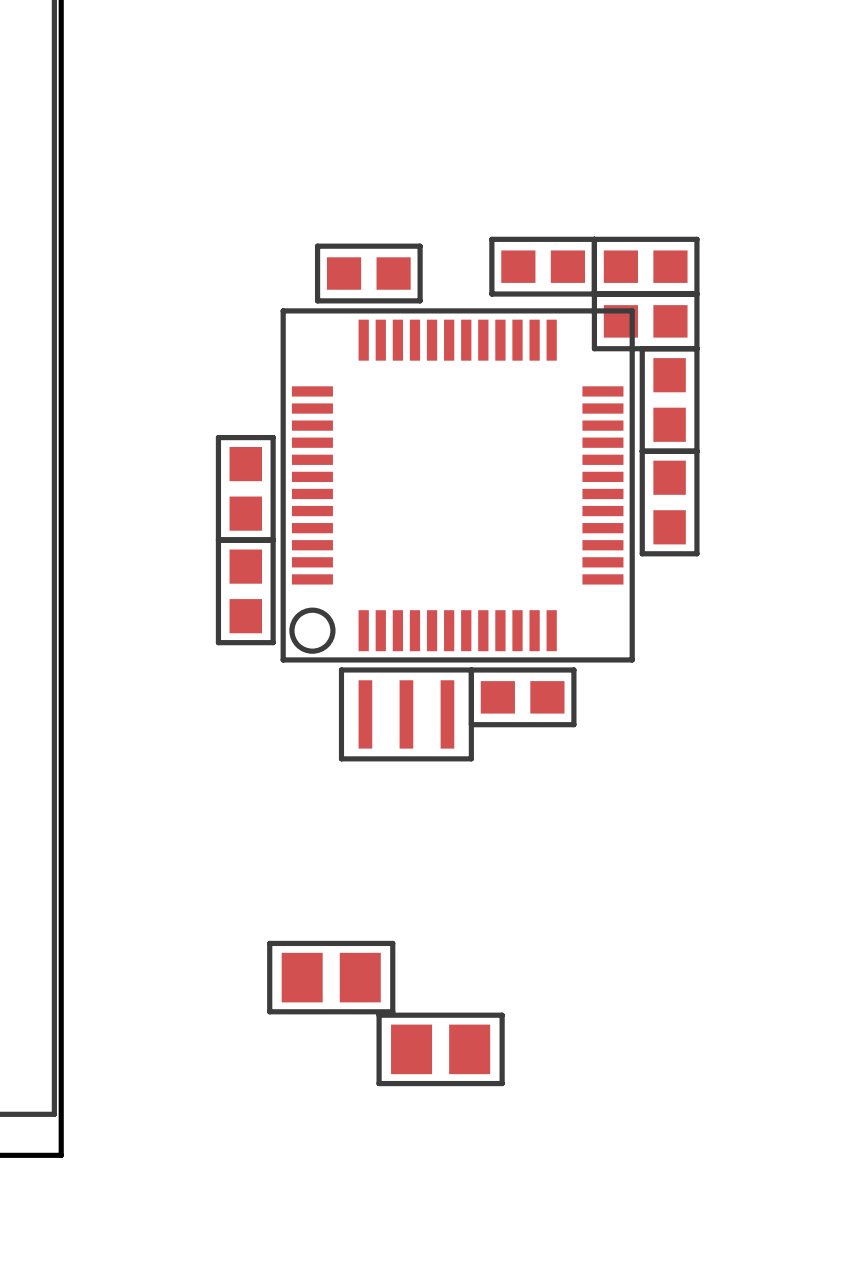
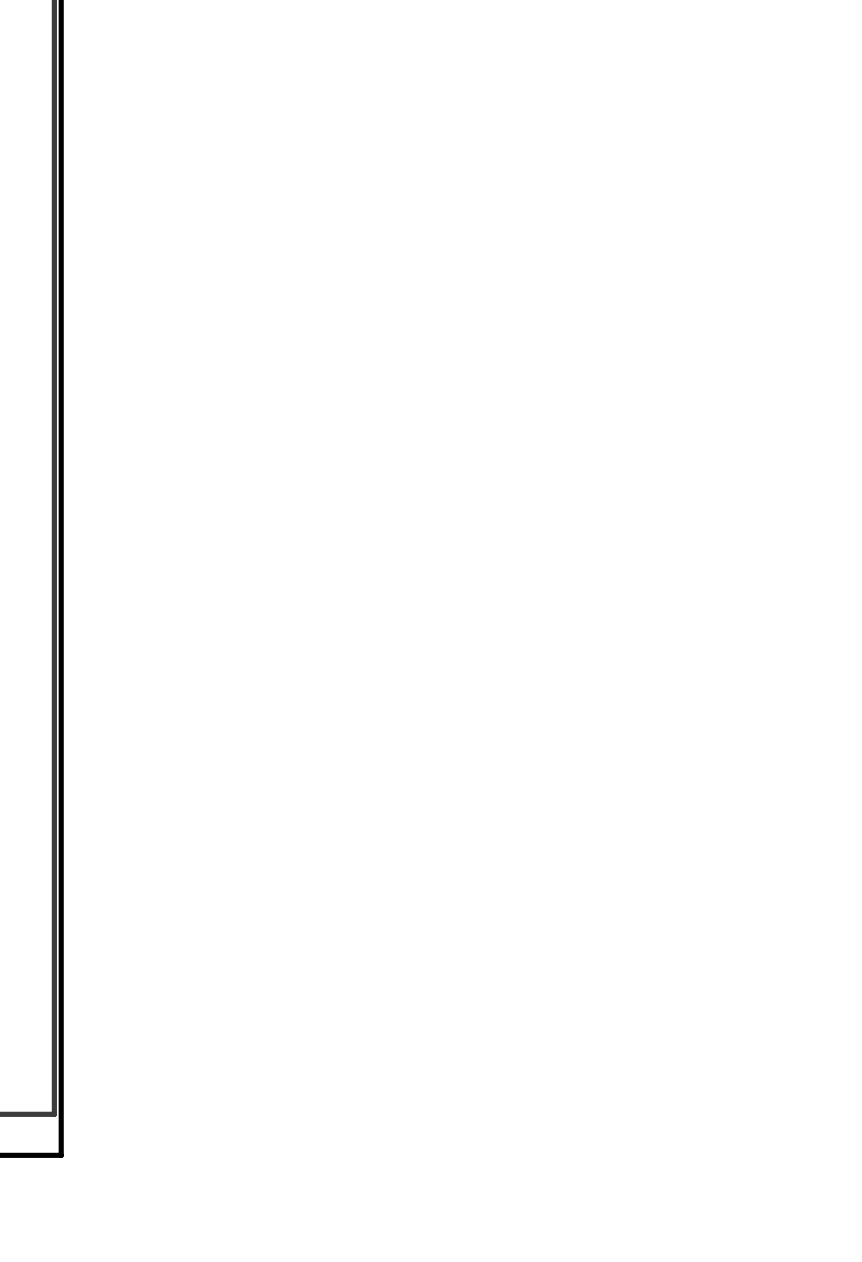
part: (543, 266) -> none
part: (645, 266) -> none
part: (368, 273) -> none
part: (645, 321) -> none
part: (669, 399) -> none
part: (457, 485) -> none
part: (245, 488) -> none
part: (669, 502) -> none
part: (245, 591) -> none
part: (522, 697) -> none
part: (406, 714) -> none
part: (331, 977) -> none
part: (440, 1049) -> none

